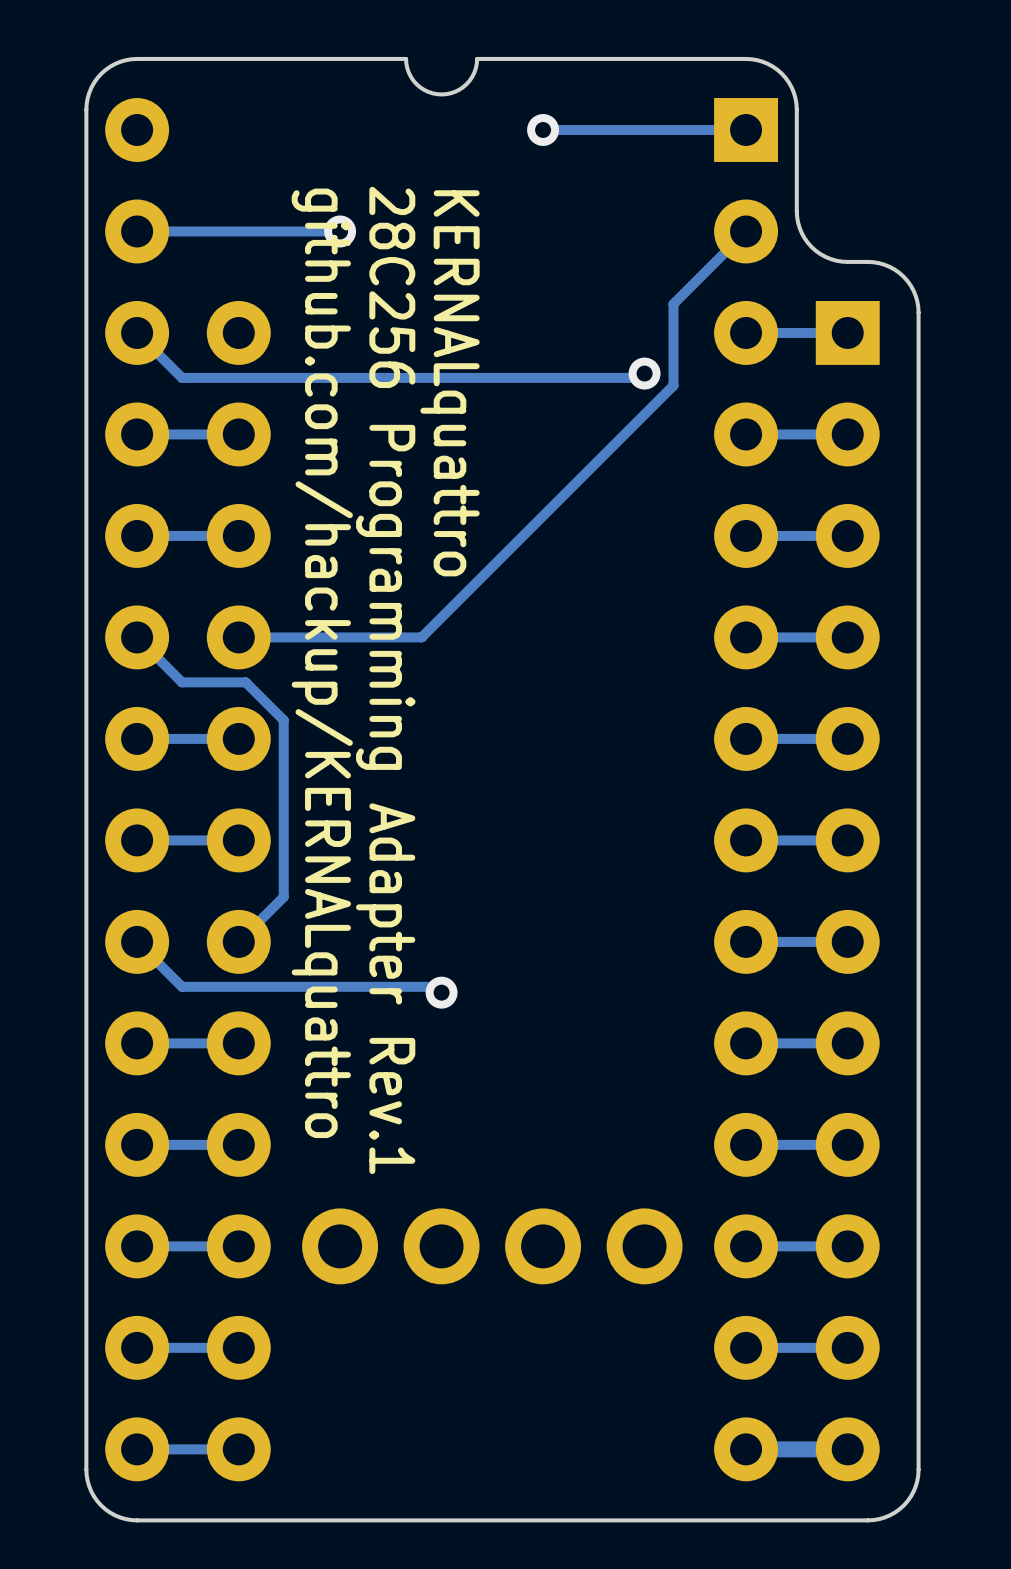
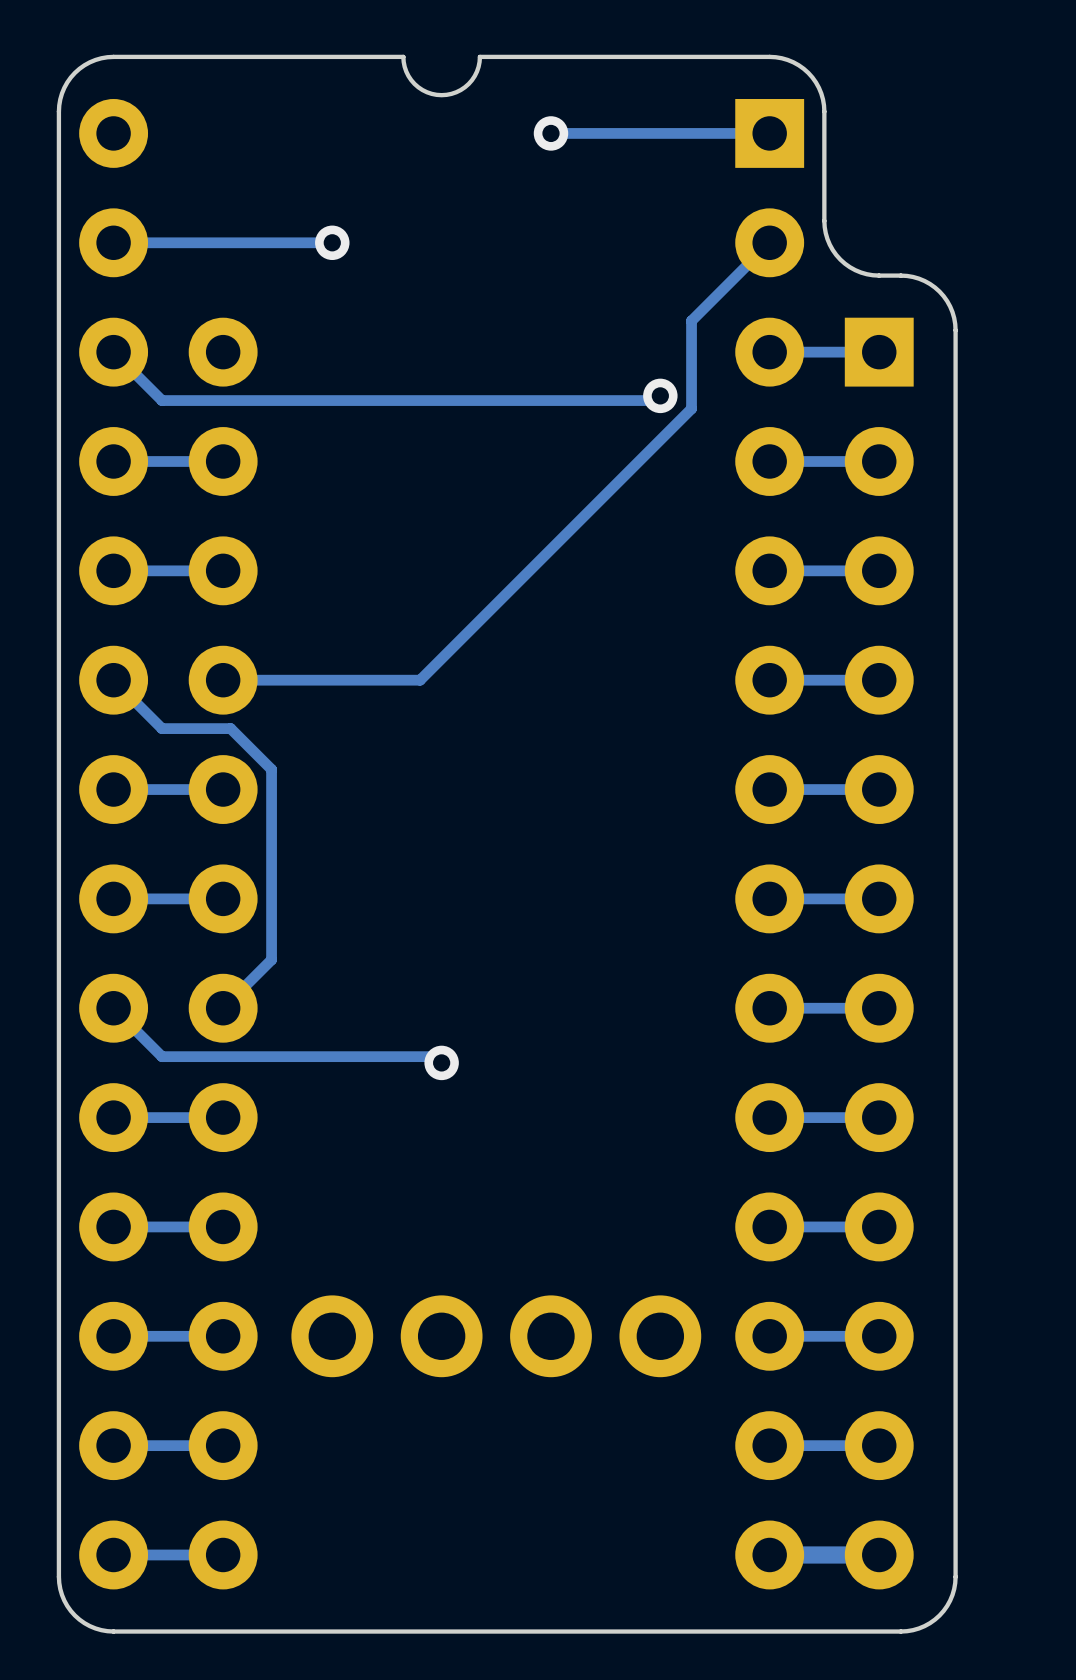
text: KERNALquattro (450, 383) -> none
text: github.com/hackup/KERNALquattro (322, 663) -> none
text: 28C256 Programming Adapter Rev.1 (385, 680) -> none

